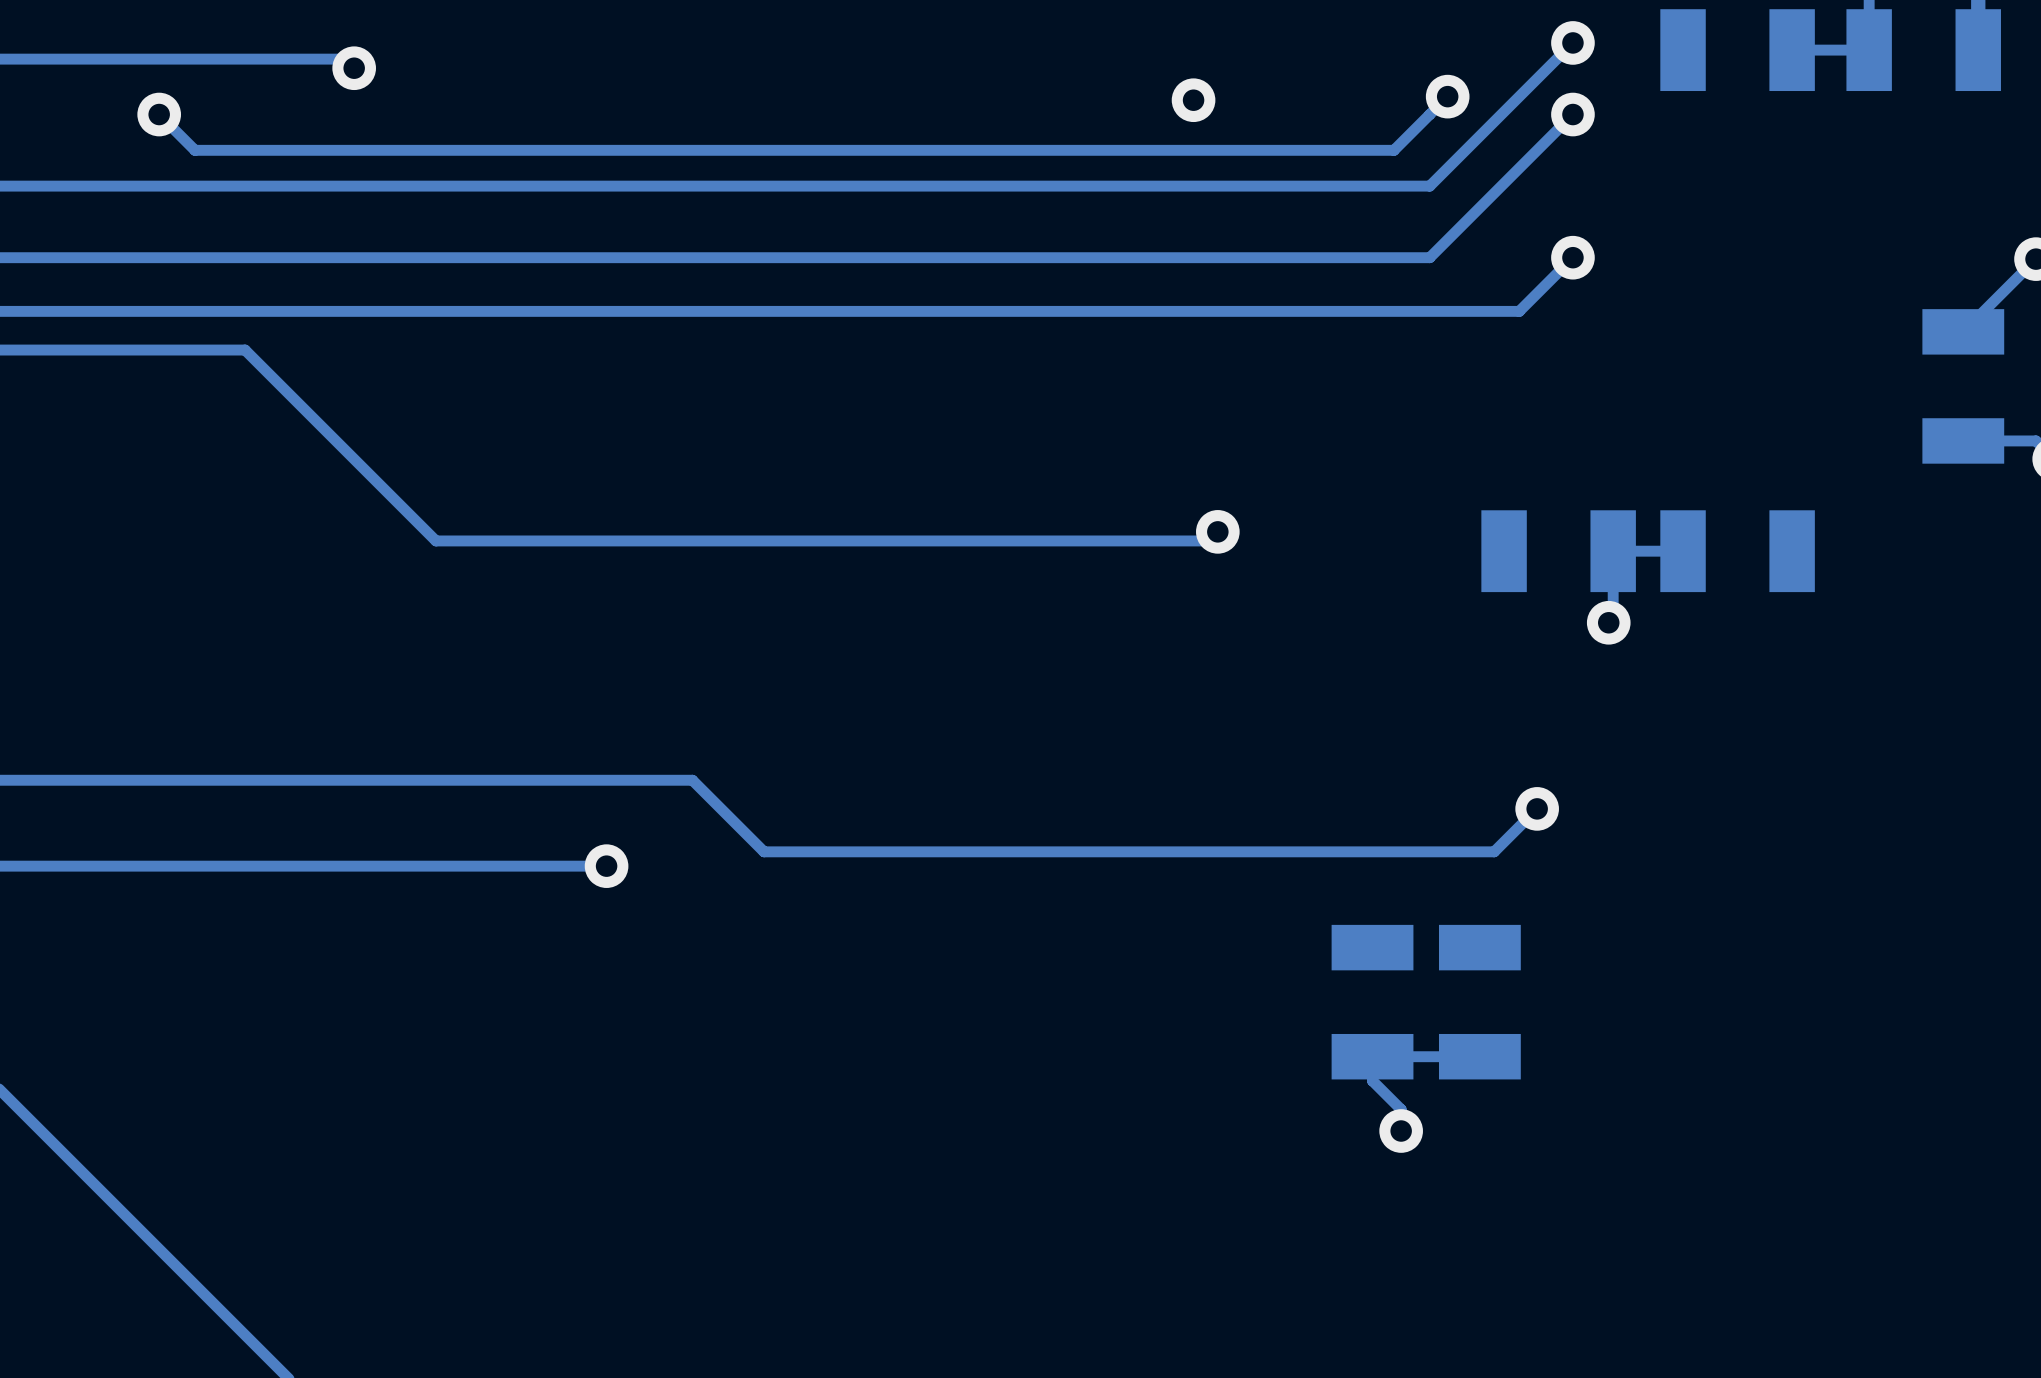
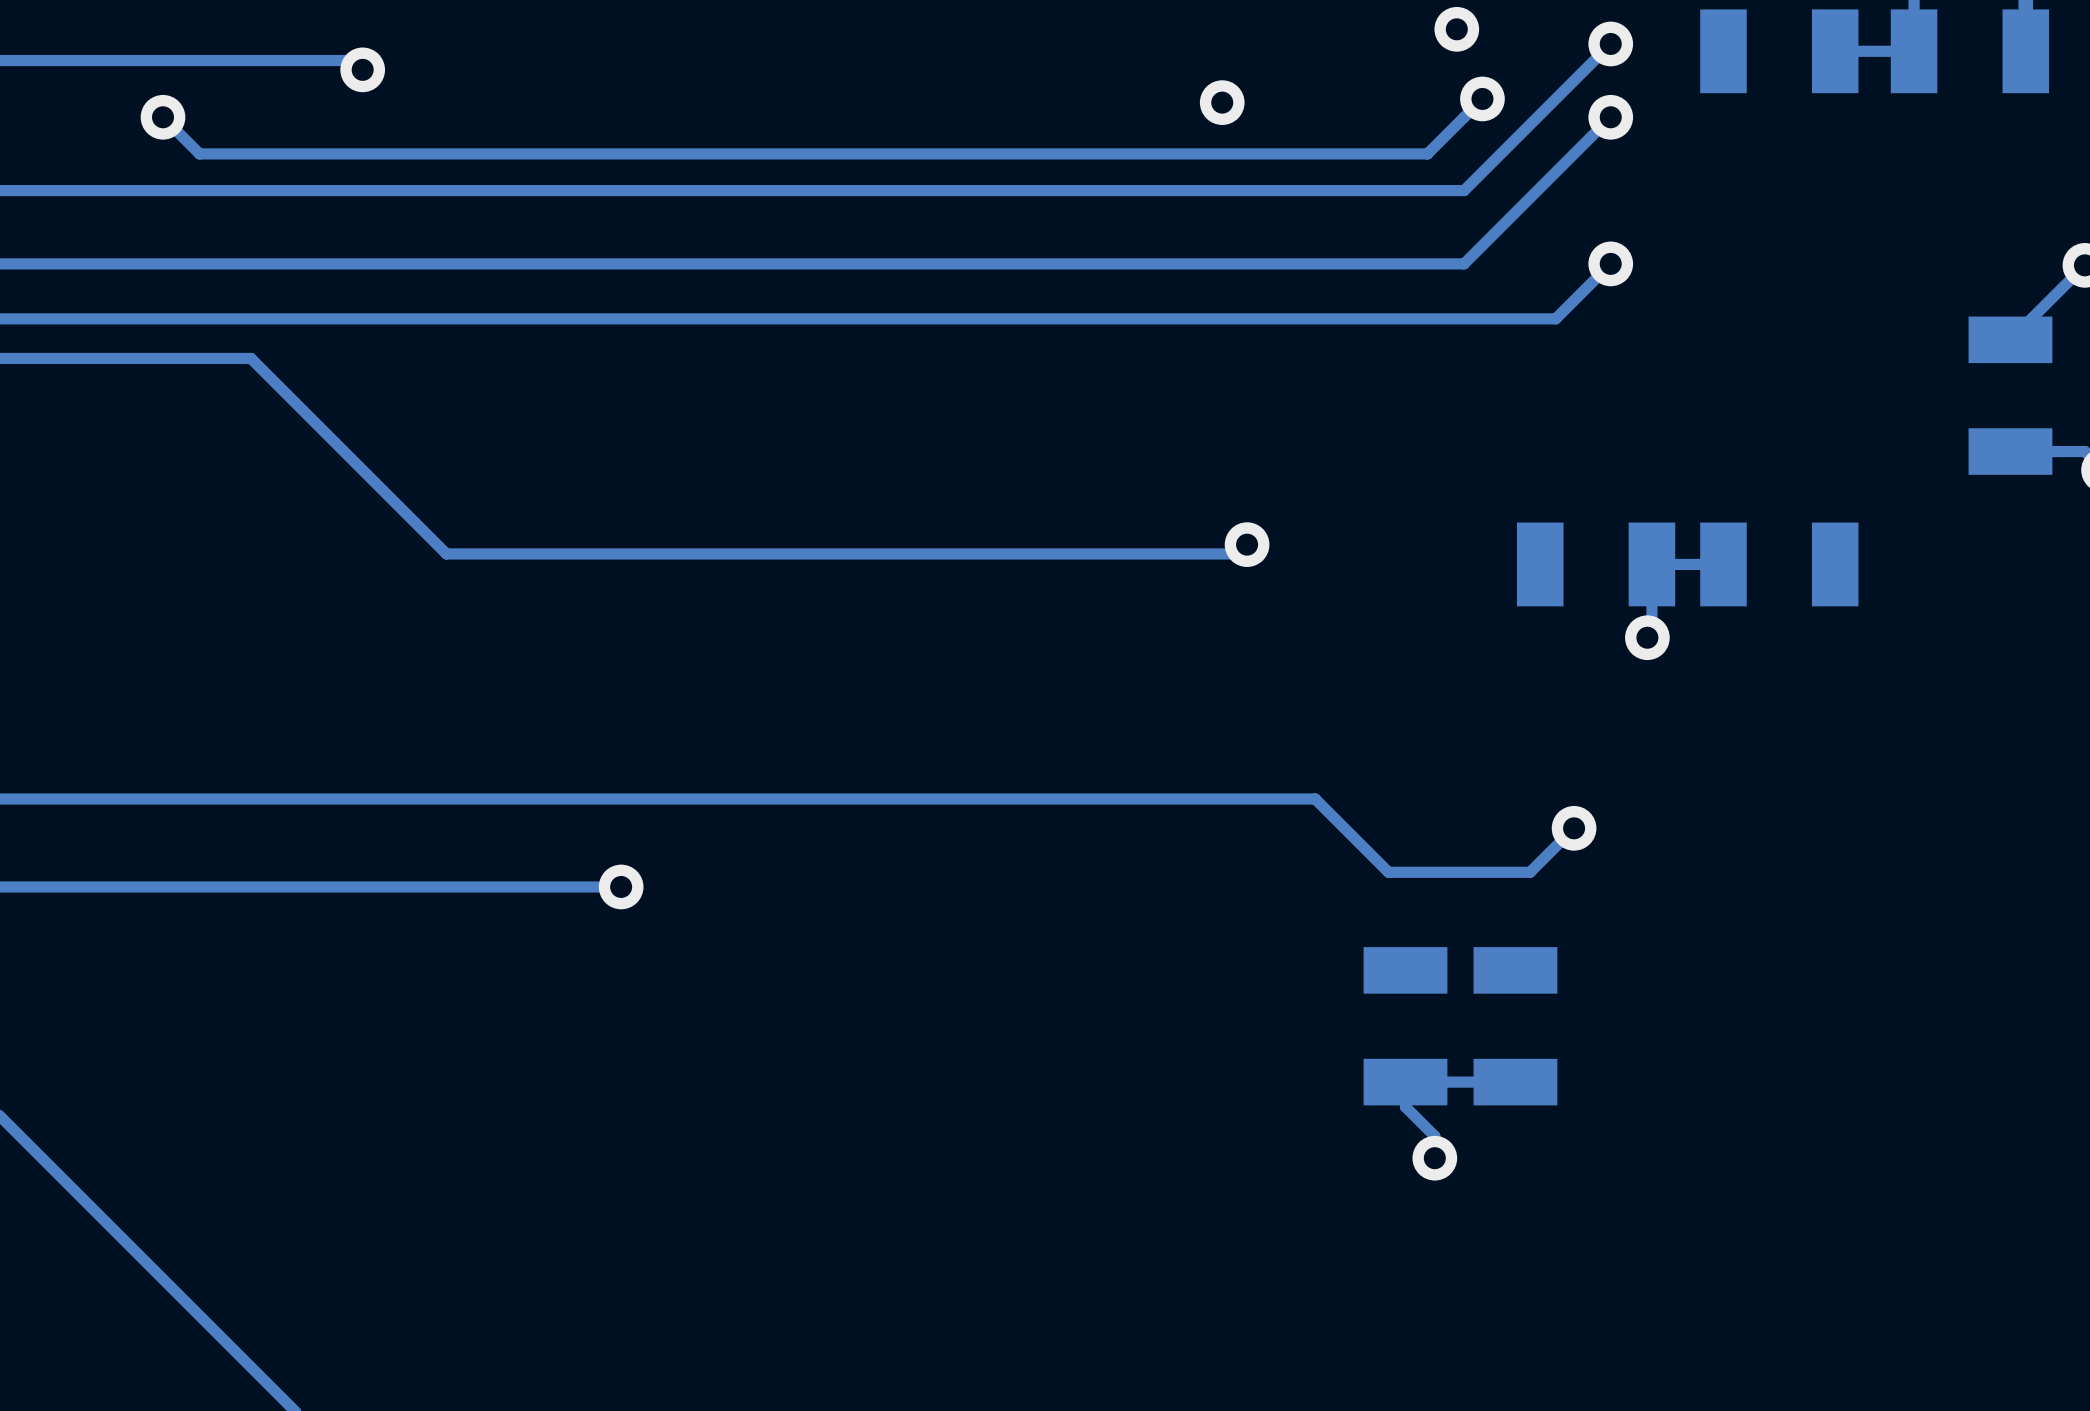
via: none -> (1456, 29)
track: (692, 780) (764, 851) (1355, 851) -> (709, 799) (1315, 799) (1388, 872)

